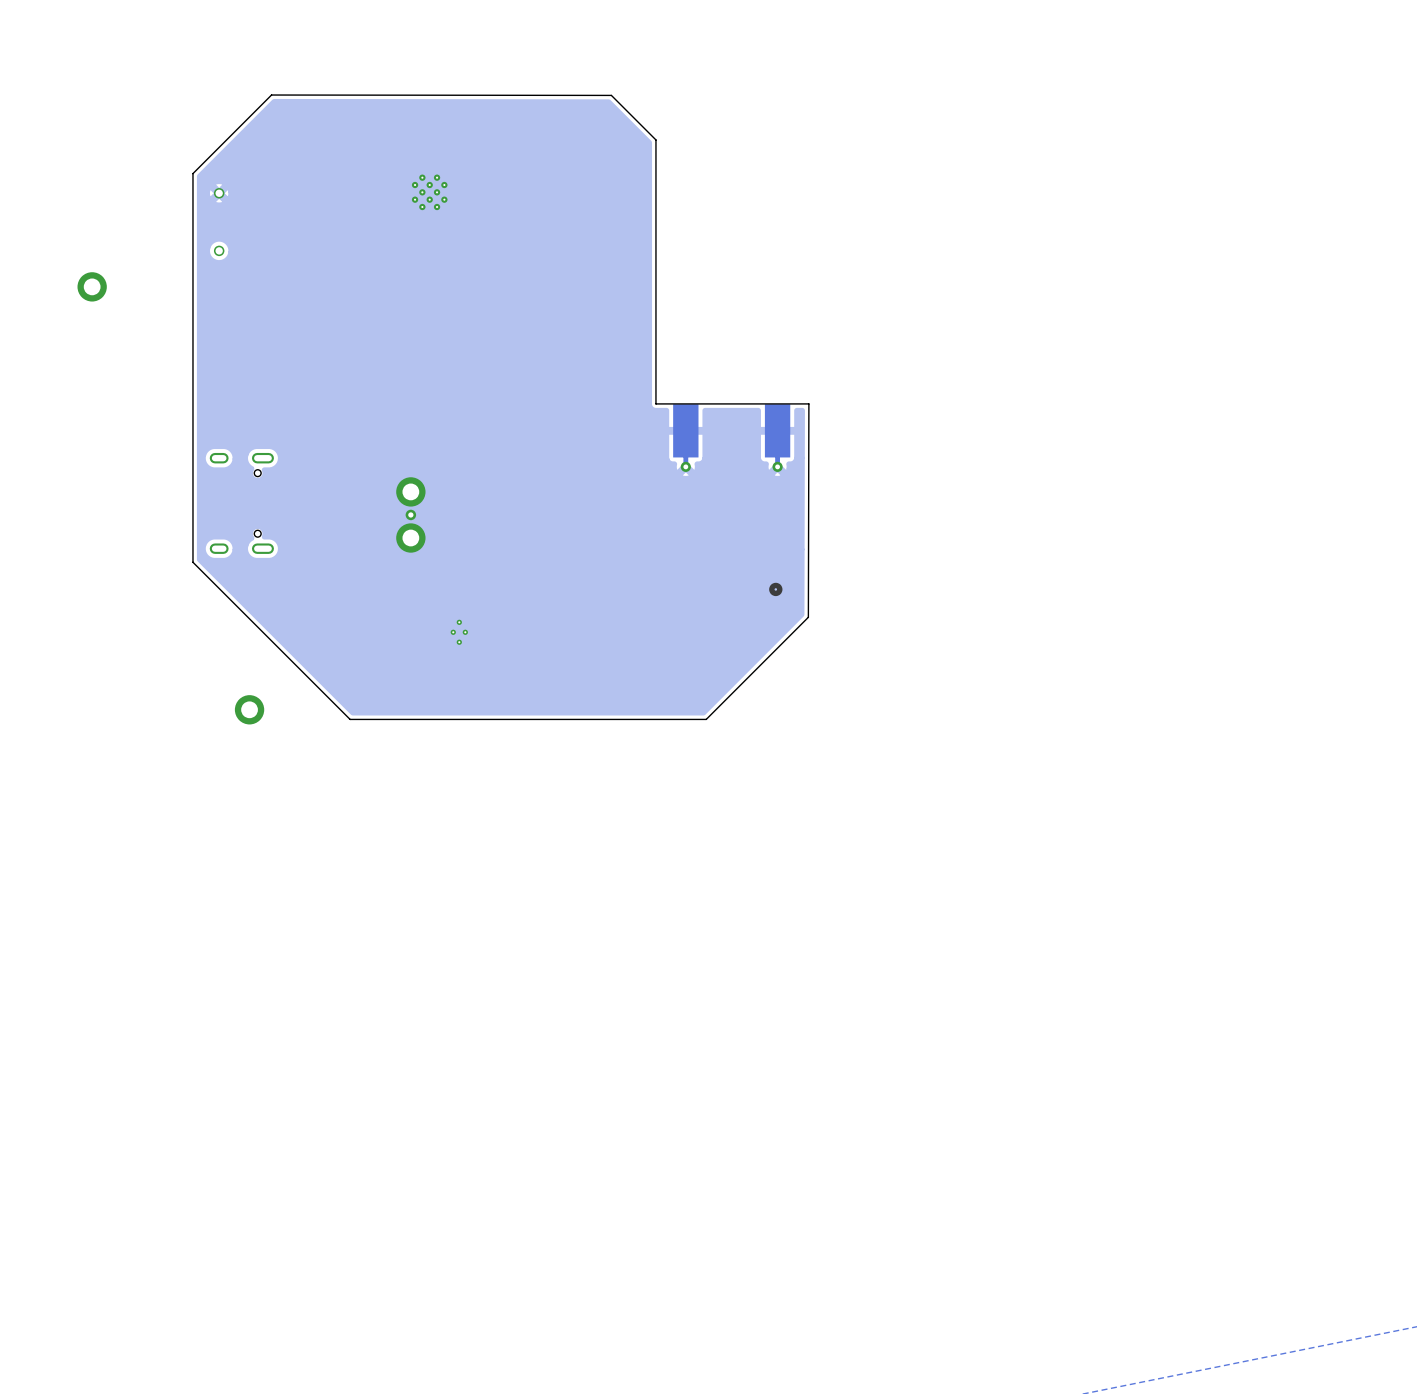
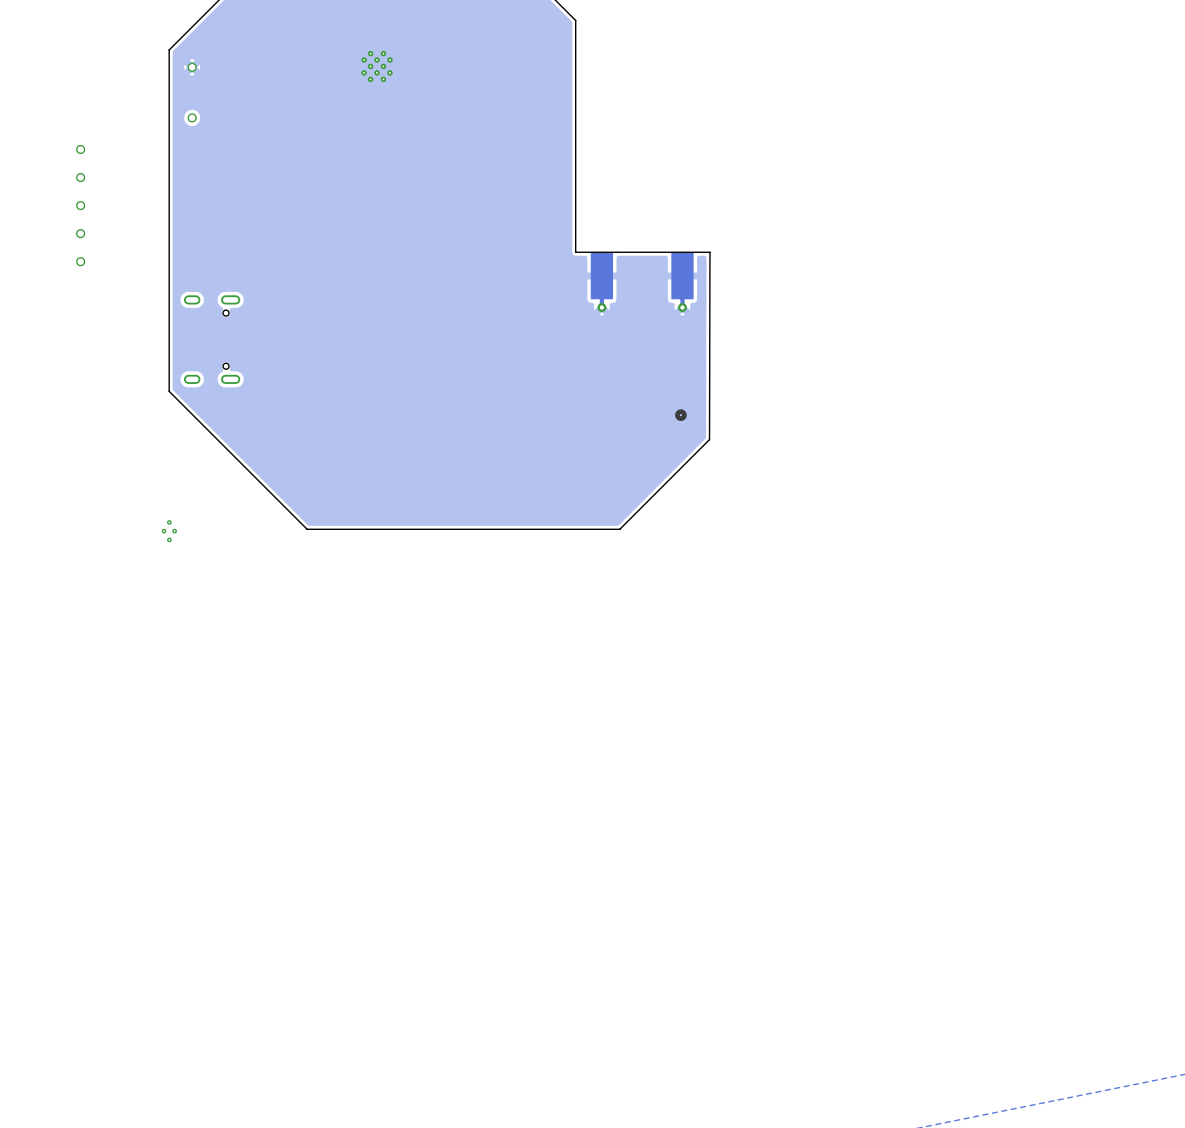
part footprint: [77, 272, 107, 302] -> [76, 144, 86, 155]
part: none -> (80, 177)
part: none -> (80, 205)
part: none -> (80, 233)
part: none -> (80, 261)
part: (410, 491) -> none
part: (410, 514) -> none
part: (410, 538) -> none
part: (459, 632) -> none
part: (249, 709) -> none
part: none -> (169, 531)

